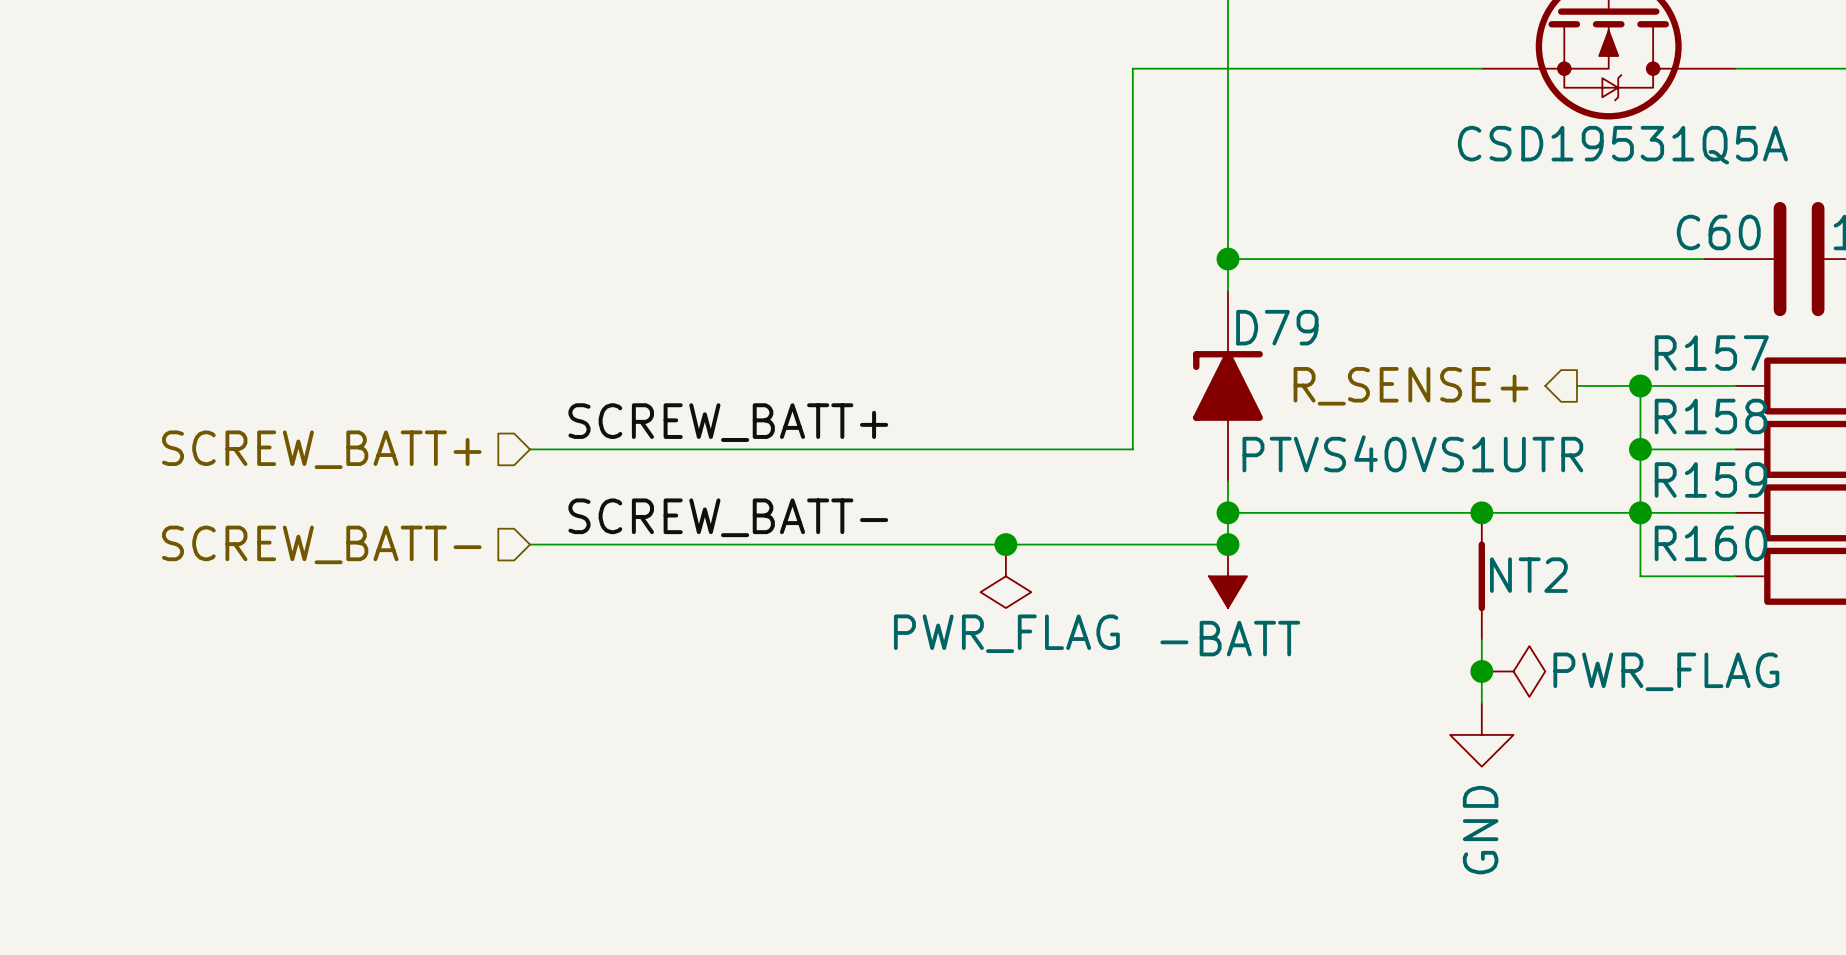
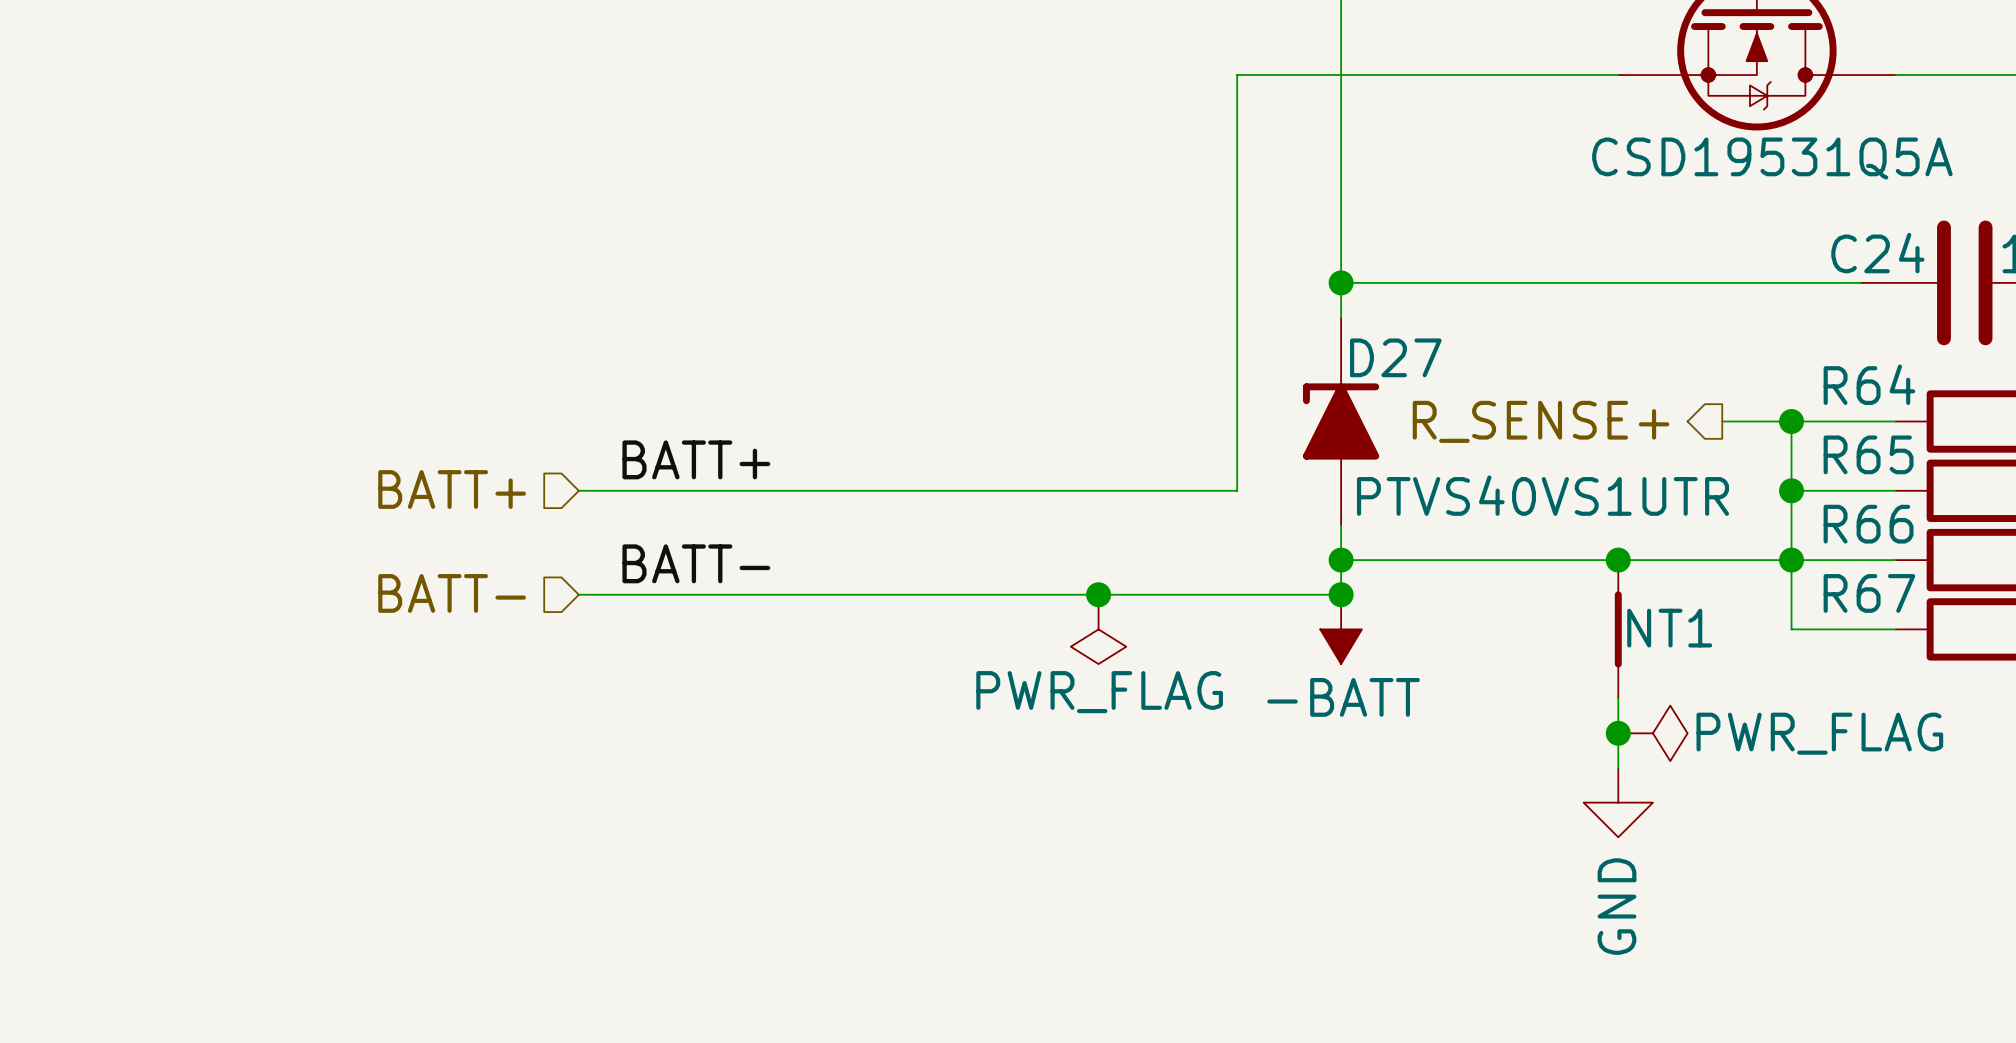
C60 name: C60 (1718, 232) -> C24 (1877, 253)
D79 name: D79 (1277, 327) -> D27 (1395, 357)
R157 name: R157 (1711, 353) -> R64 (1869, 384)
R158 name: R158 (1710, 416) -> R65 (1868, 454)
label: SCREW_BATT+ (728, 422) -> BATT+ (696, 459)
hierarchical label: SCREW_BATT+ (321, 449) -> BATT+ (452, 489)
R159 name: R159 (1710, 479) -> R66 (1868, 524)
label: SCREW_BATT- (728, 517) -> BATT- (696, 563)
R160 name: R160 (1710, 543) -> R67 (1869, 593)
hierarchical label: SCREW_BATT- (321, 544) -> BATT- (452, 593)
NT2 name: NT2 (1528, 575) -> NT1 (1669, 628)

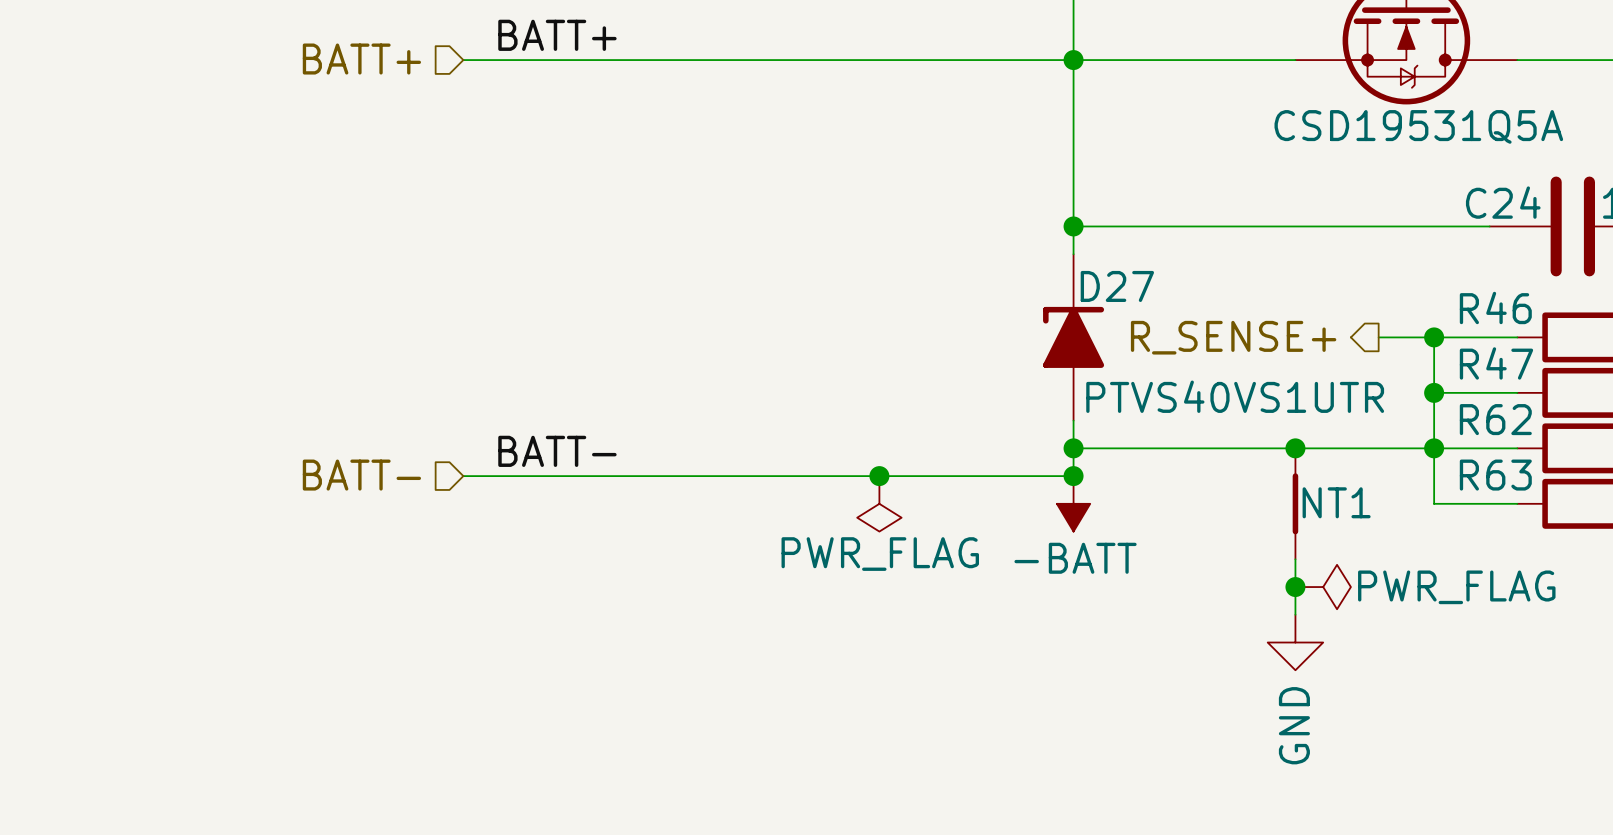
wire: (1237, 75) (1237, 490) (578, 490) -> (990, 60) (463, 60)
junction: none -> (1073, 60)
R64 name: R64 (1869, 384) -> R46 (1495, 307)
R65 name: R65 (1868, 454) -> R47 (1496, 363)
label position: BATT+ (696, 459) -> BATT+ (557, 35)
hierarchical label position: BATT+ (452, 489) -> BATT+ (361, 59)
R66 name: R66 (1868, 524) -> R62 (1495, 419)
R67 name: R67 (1869, 593) -> R63 (1495, 475)

